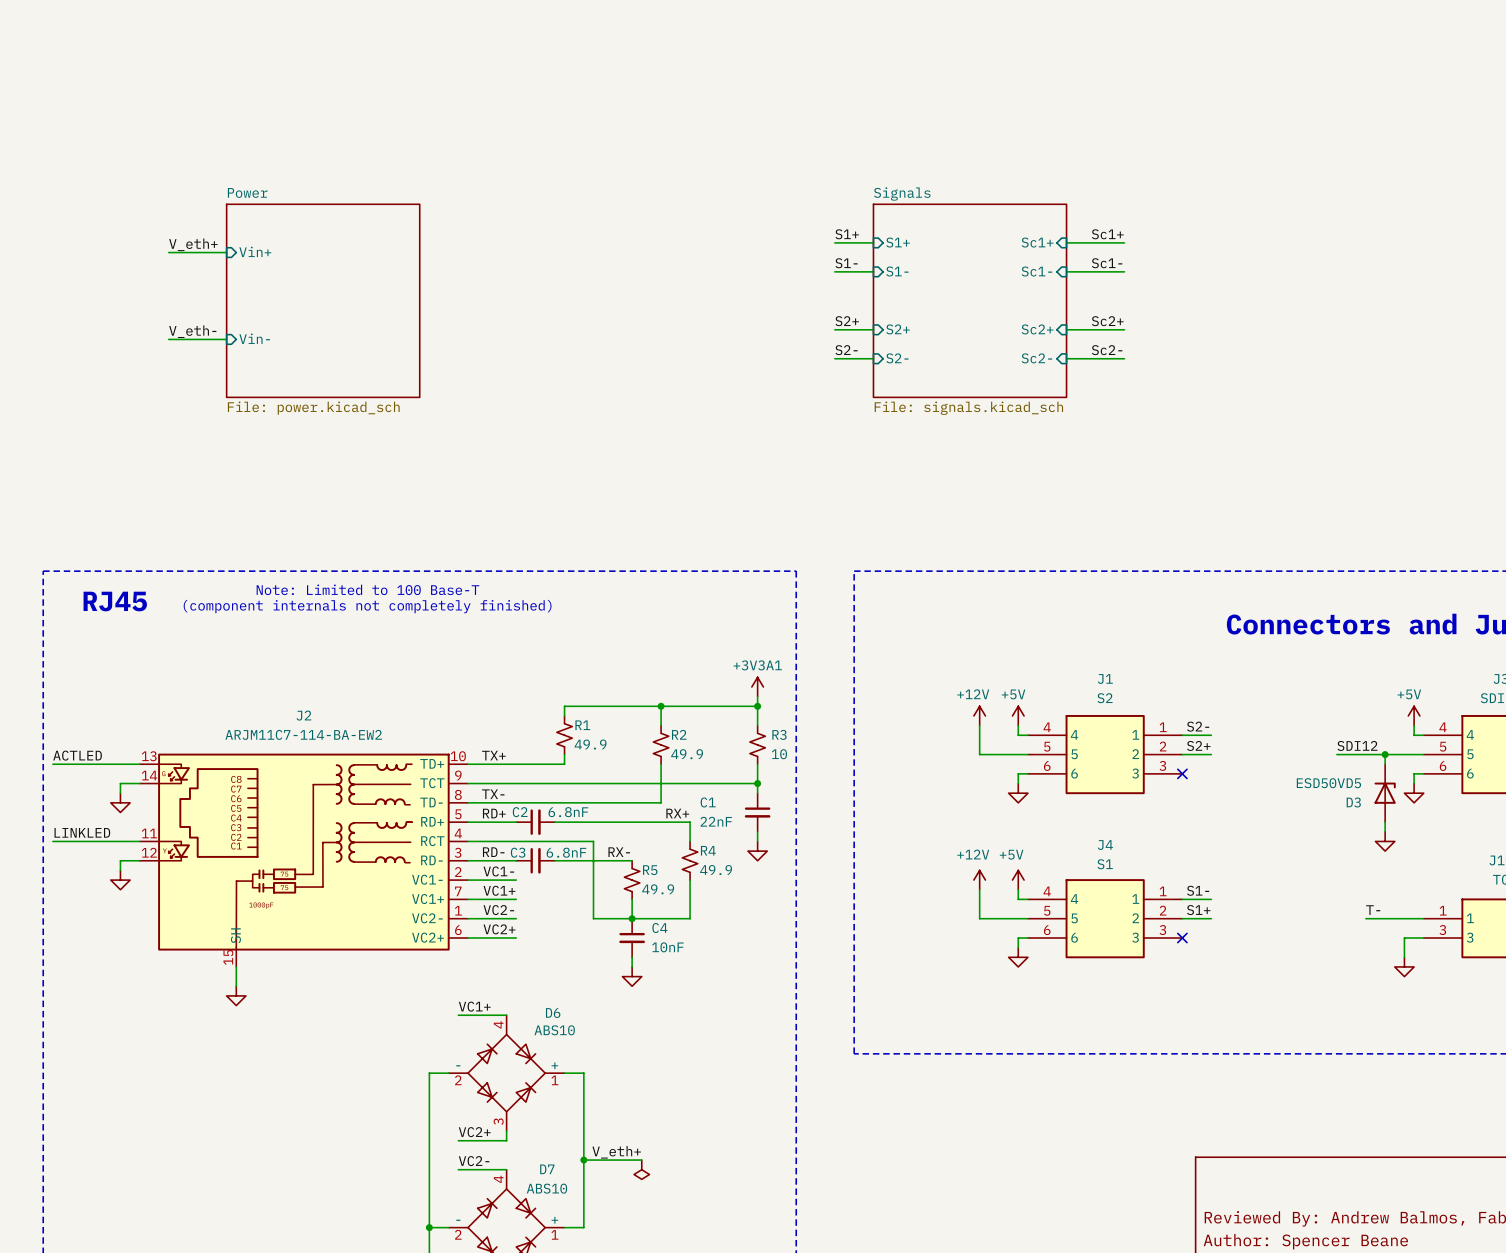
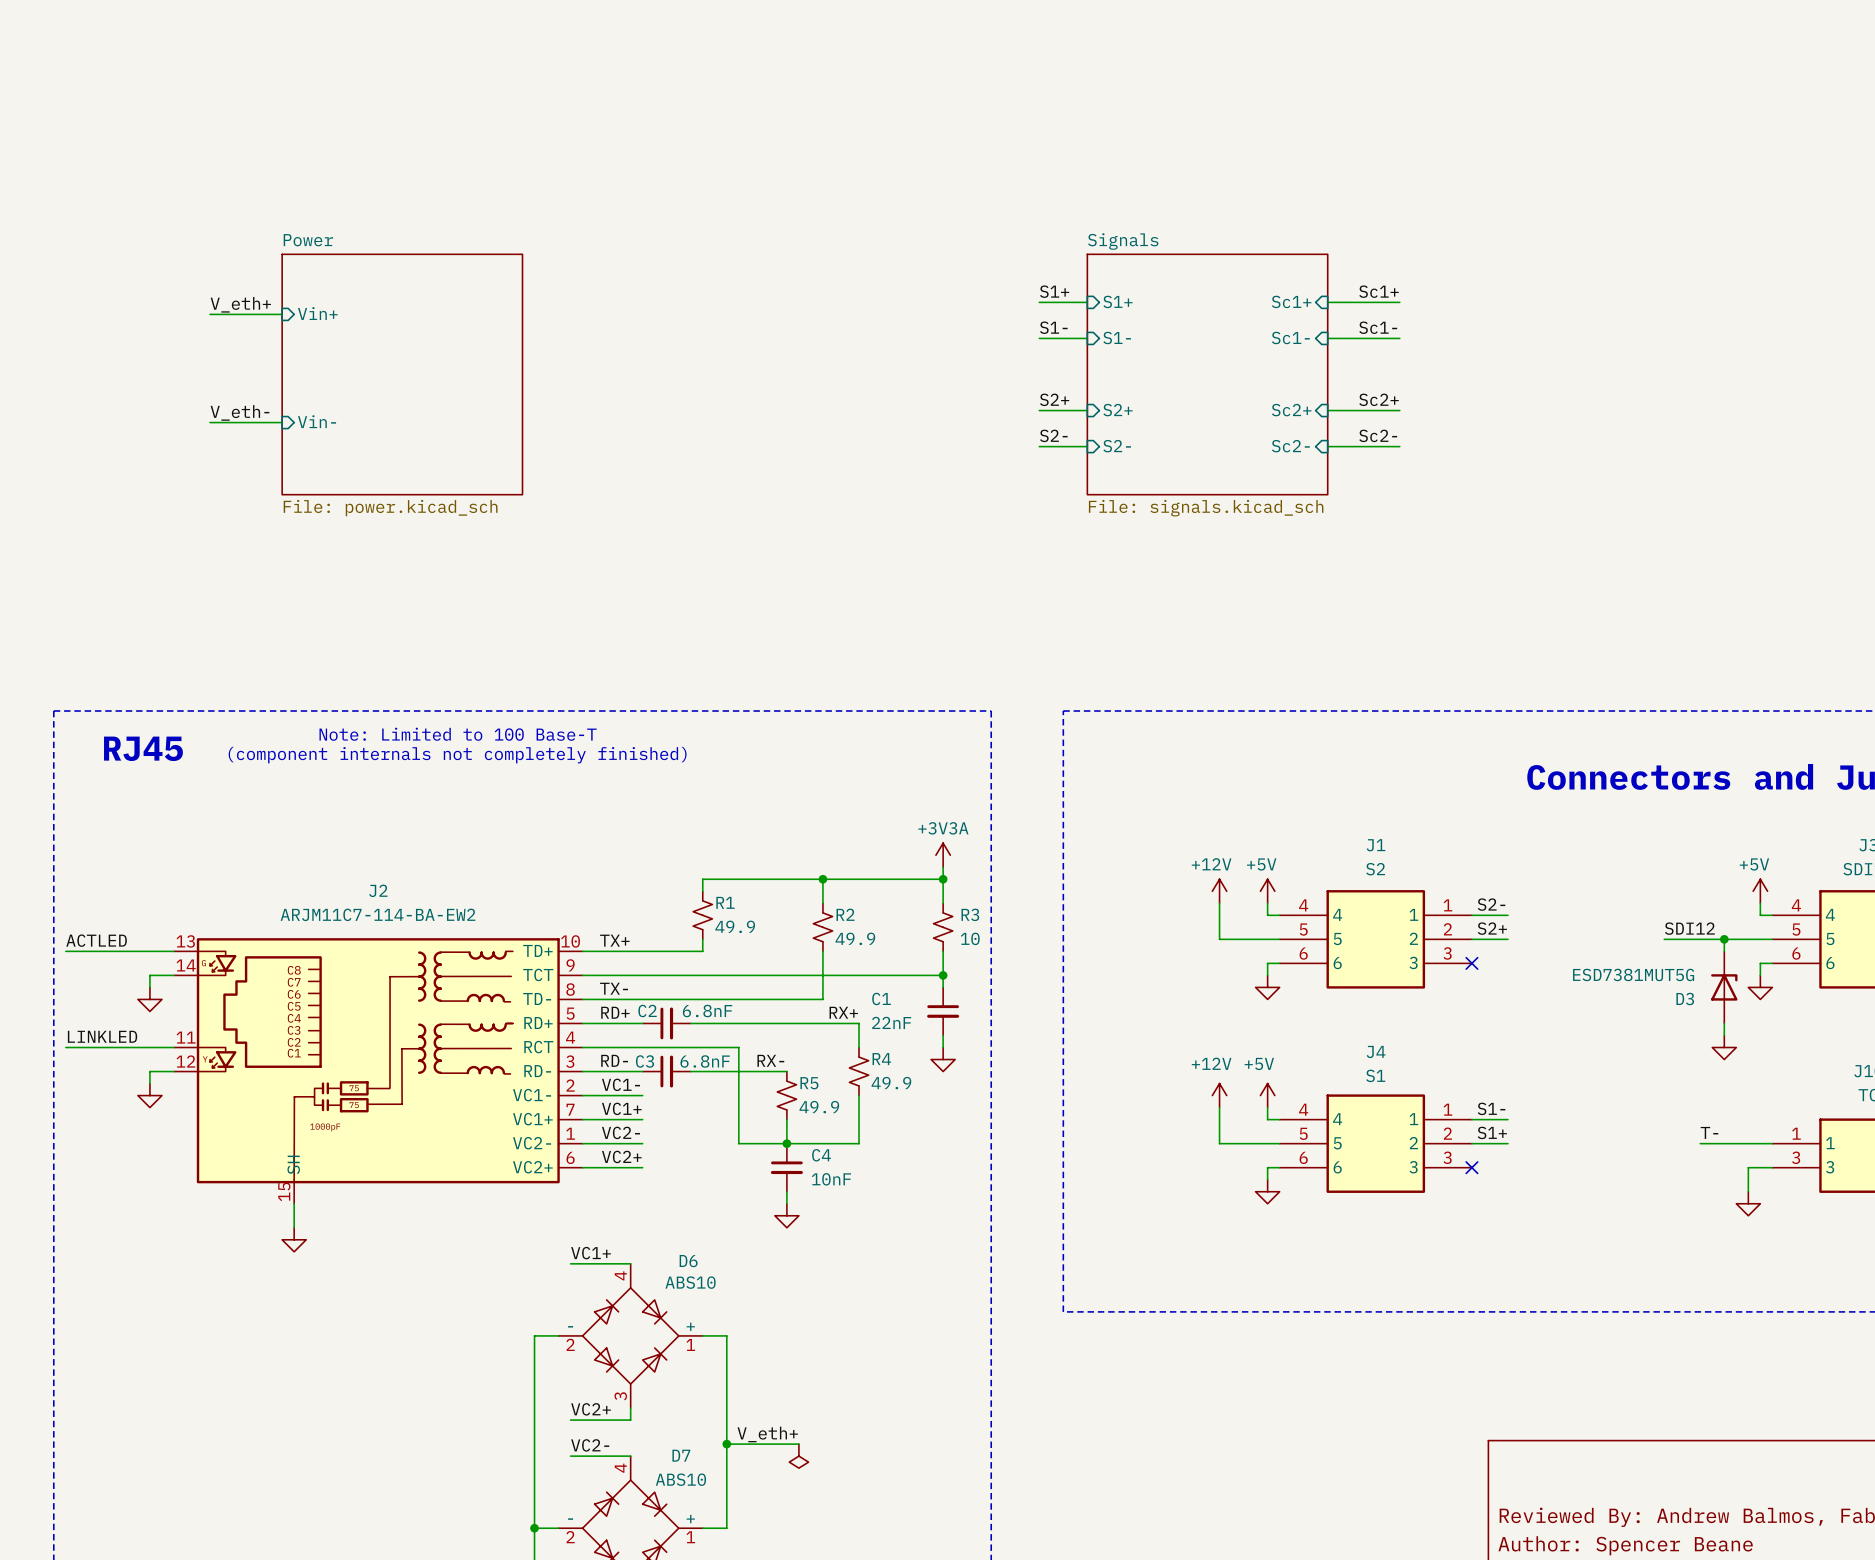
power symbol: +3V3A1 (757, 687) -> +3V3A (943, 855)
D3 value: ESD50VD5 (1328, 783) -> ESD7381MUT5G (1633, 974)

